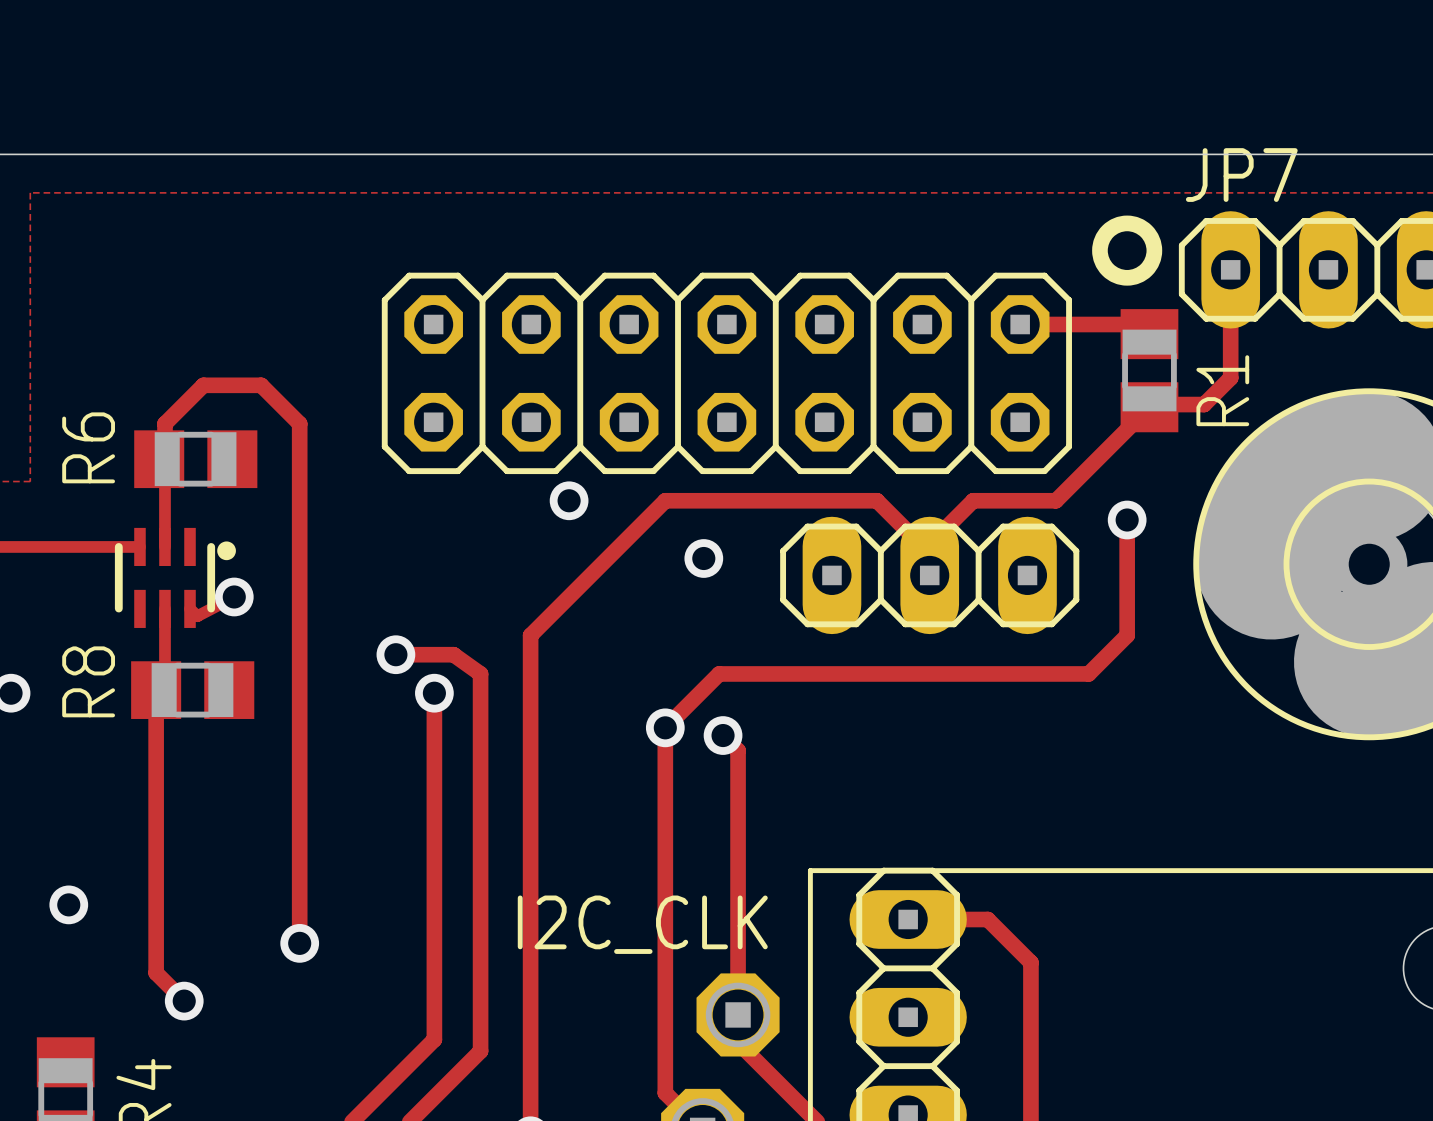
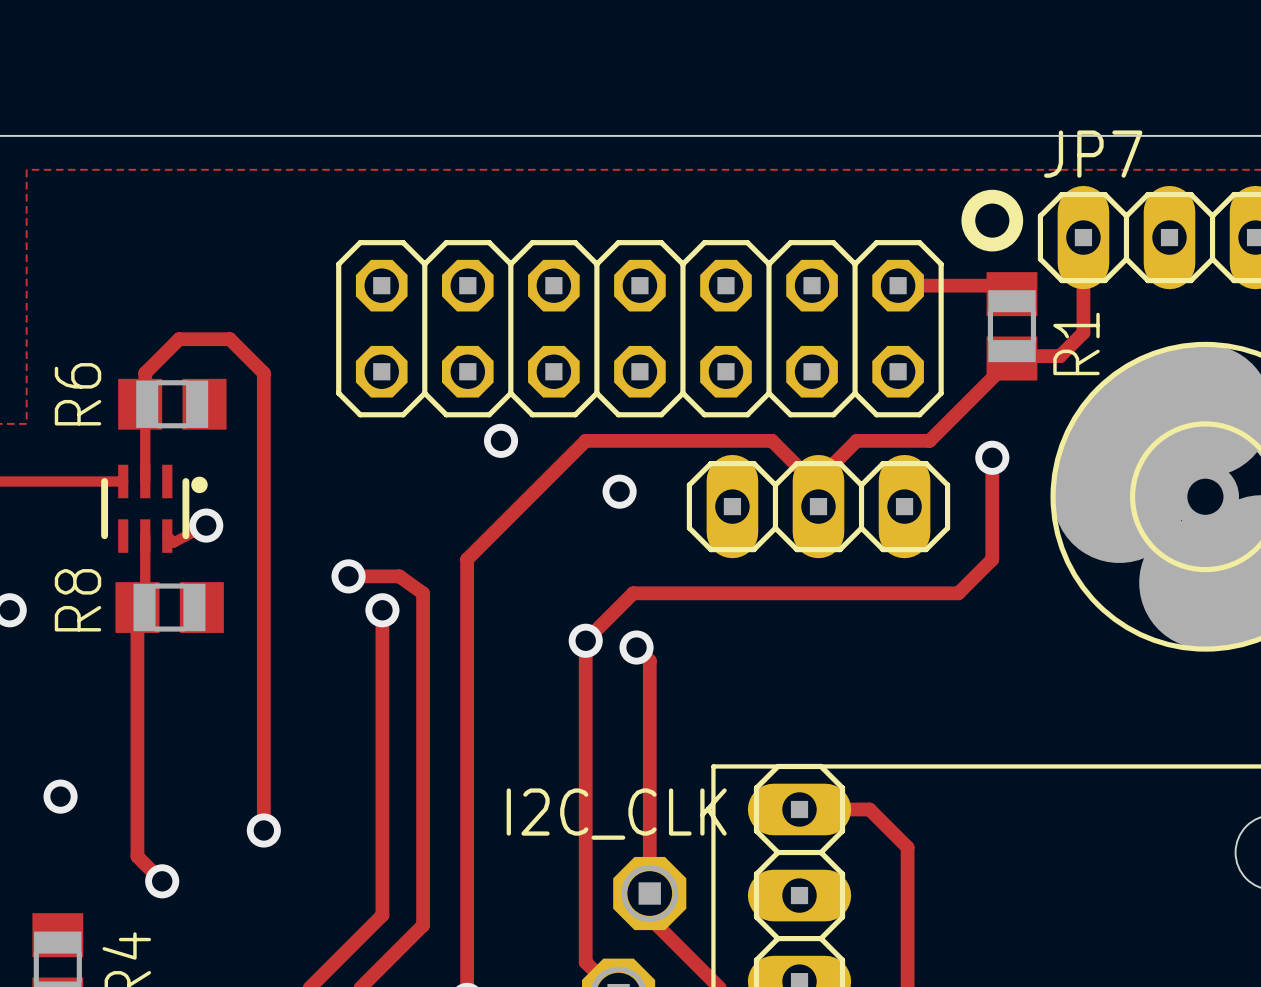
I2C_CLK name position: I2C_CLK (642, 924) -> I2C_CLK (616, 814)

